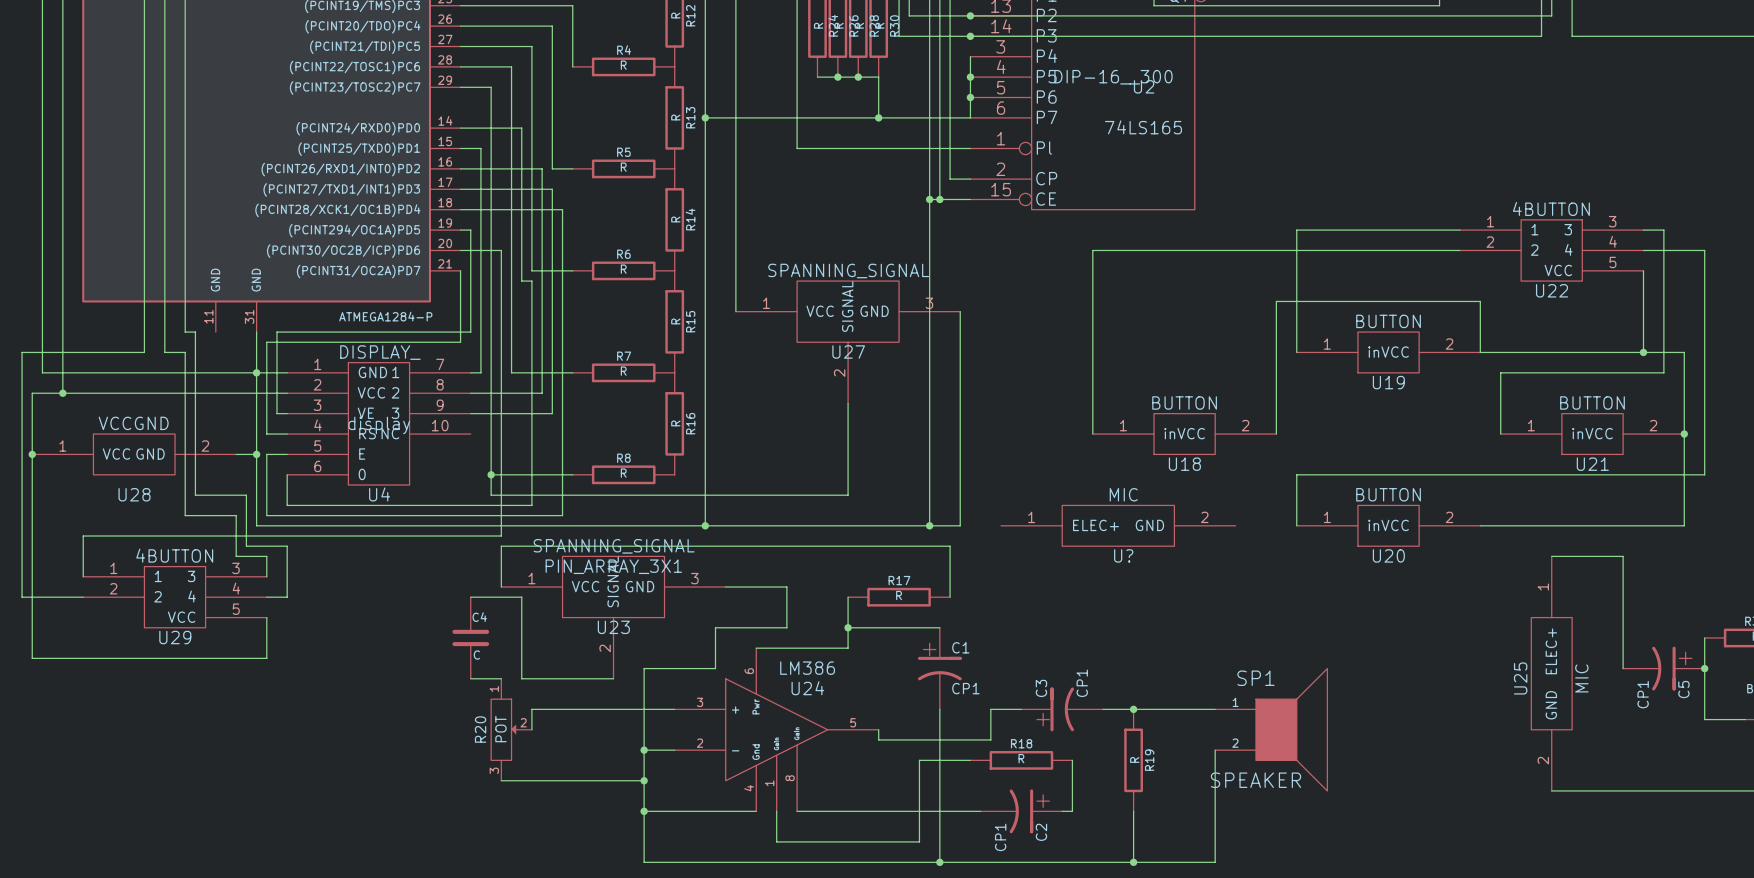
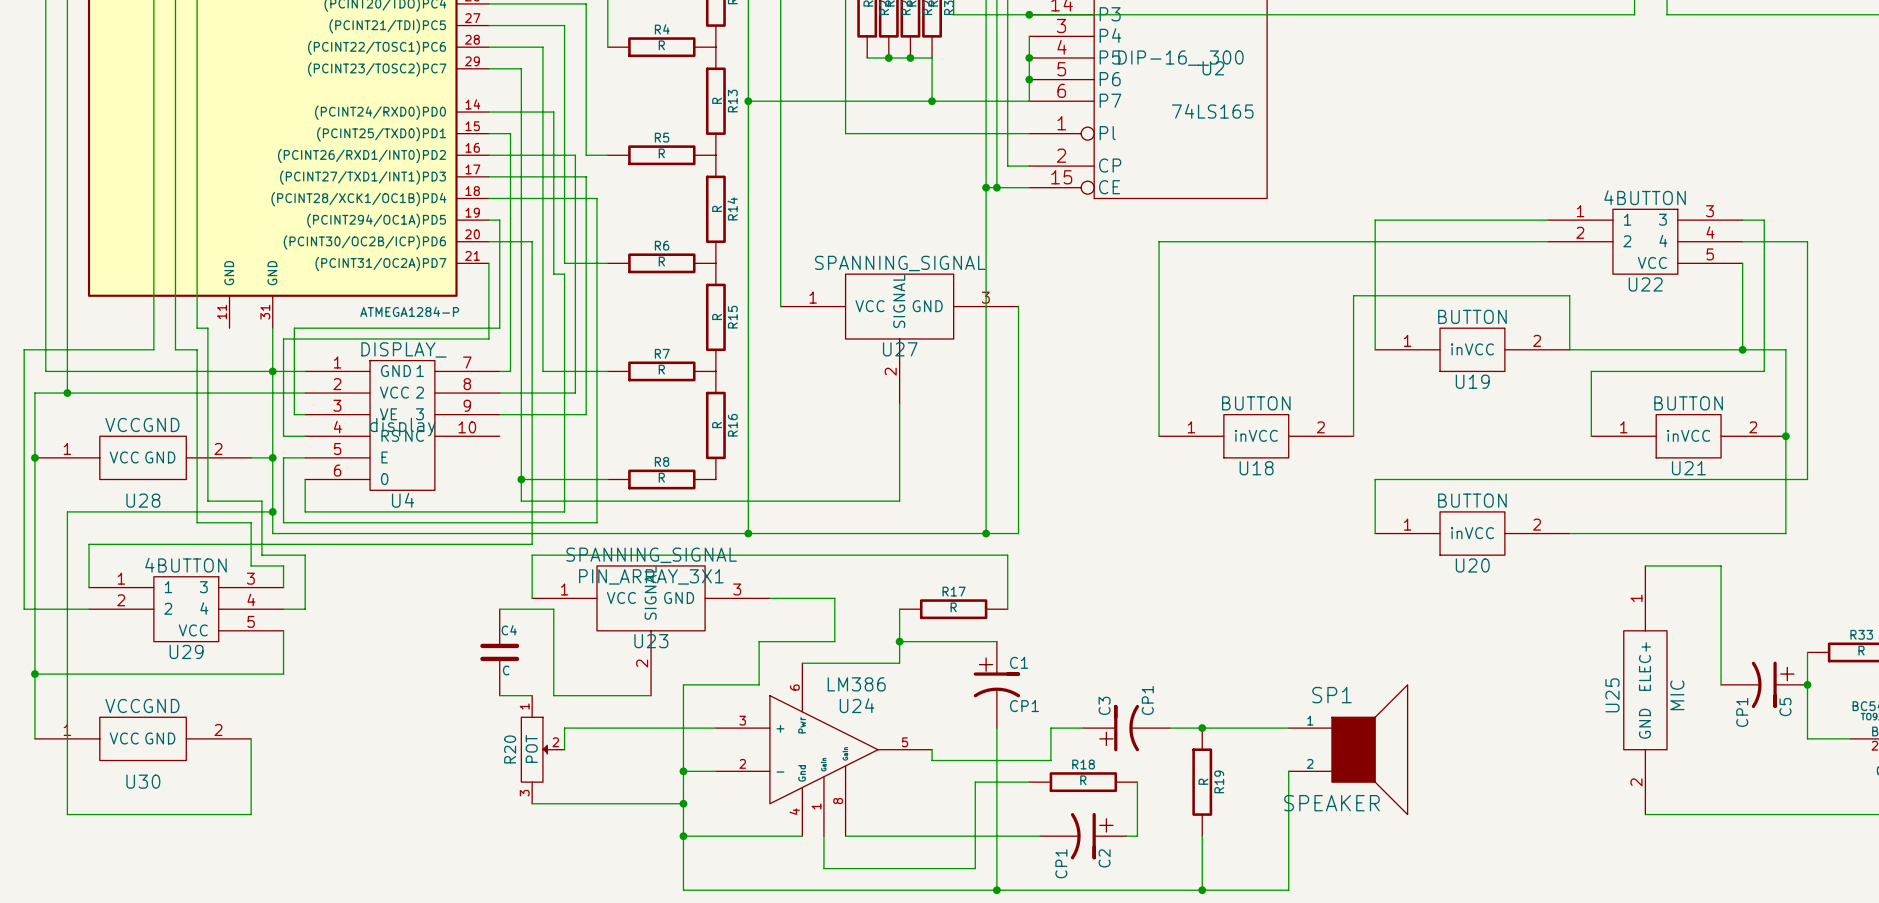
wire: none -> (272, 511) (67, 511) (67, 814) (251, 814) (251, 738)
junction: none -> (272, 511)
U?: MIC (1118, 525) -> none
wire: none -> (34, 674) (34, 738)
junction: none -> (34, 674)
U30: none -> VCCGND (143, 738)

